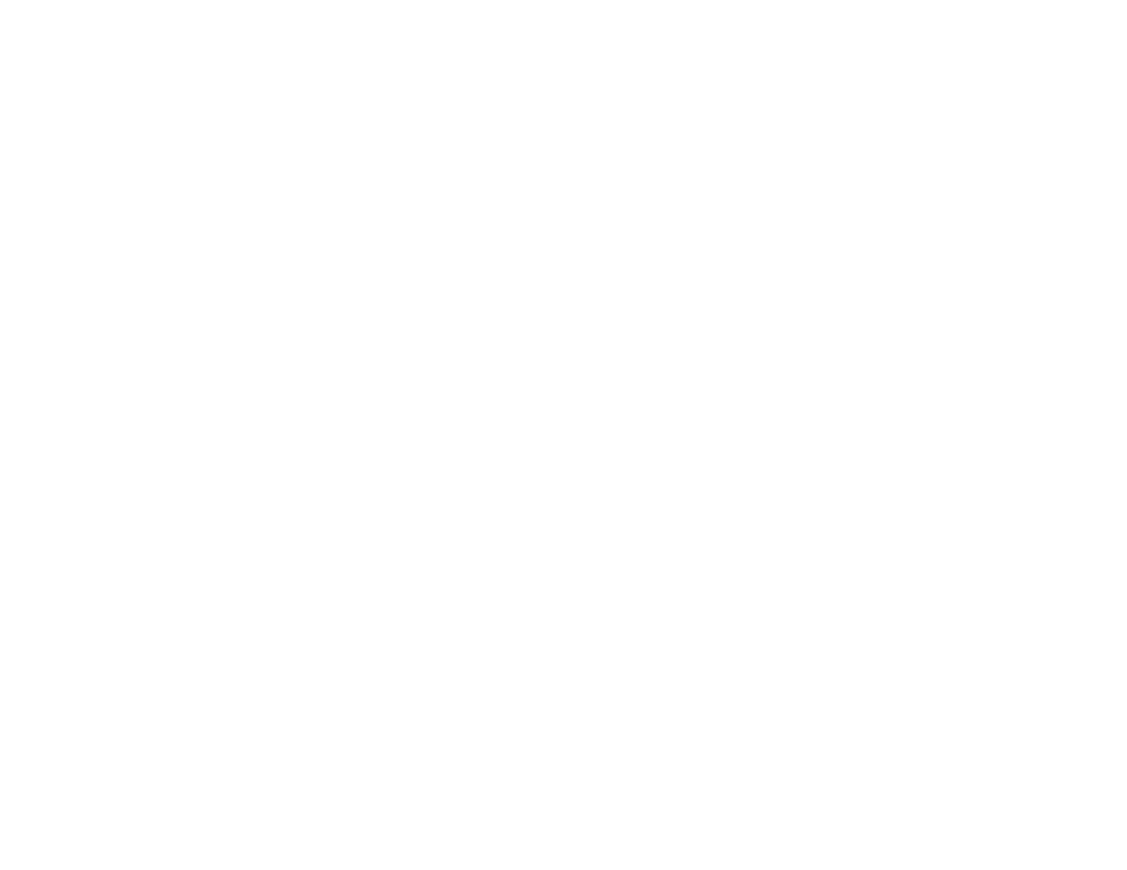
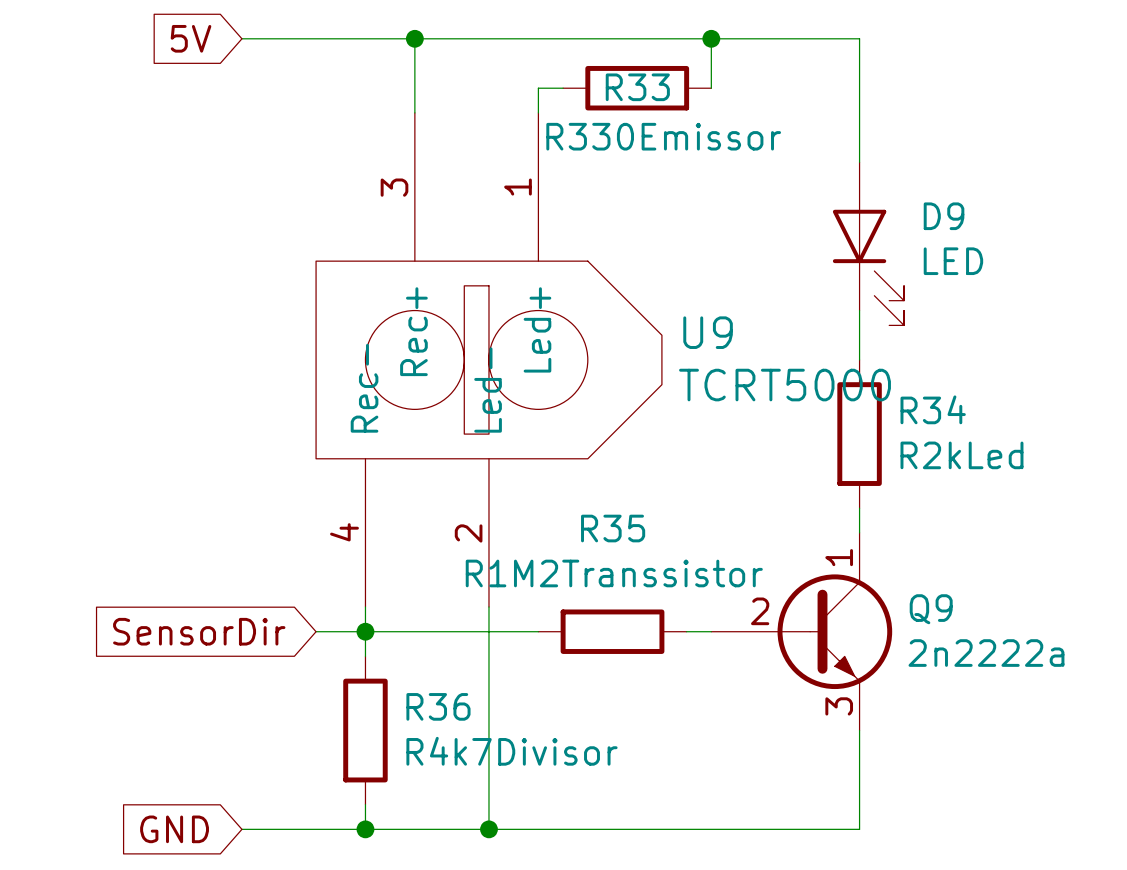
global label: none -> 5V (191, 38)
wire: none -> (241, 38) (859, 38) (859, 162)
wire: none -> (414, 38) (414, 112)
junction: none -> (414, 38)
wire: none -> (711, 38) (711, 88)
junction: none -> (711, 38)
wire: none -> (563, 88) (538, 88) (538, 112)
R33: none -> R330Emissor (637, 88)
D9: none -> LED (868, 243)
wire: none -> (859, 310) (859, 359)
U9: none -> TCRT5000 (488, 359)
R34: none -> R2kLed (859, 434)
wire: none -> (859, 508) (859, 532)
wire: none -> (365, 607) (365, 656)
wire: none -> (488, 607) (488, 829)
global label: none -> SensorDir (199, 631)
wire: none -> (316, 631) (538, 631)
junction: none -> (365, 631)
R35: none -> R1M2Transsistor (612, 631)
wire: none -> (686, 631) (711, 631)
Q9: none -> 2n2222a (801, 631)
R36: none -> R4k7Divisor (365, 730)
wire: none -> (859, 730) (859, 829) (241, 829)
wire: none -> (365, 804) (365, 829)
global label: none -> GND (174, 829)
junction: none -> (365, 829)
junction: none -> (488, 829)

